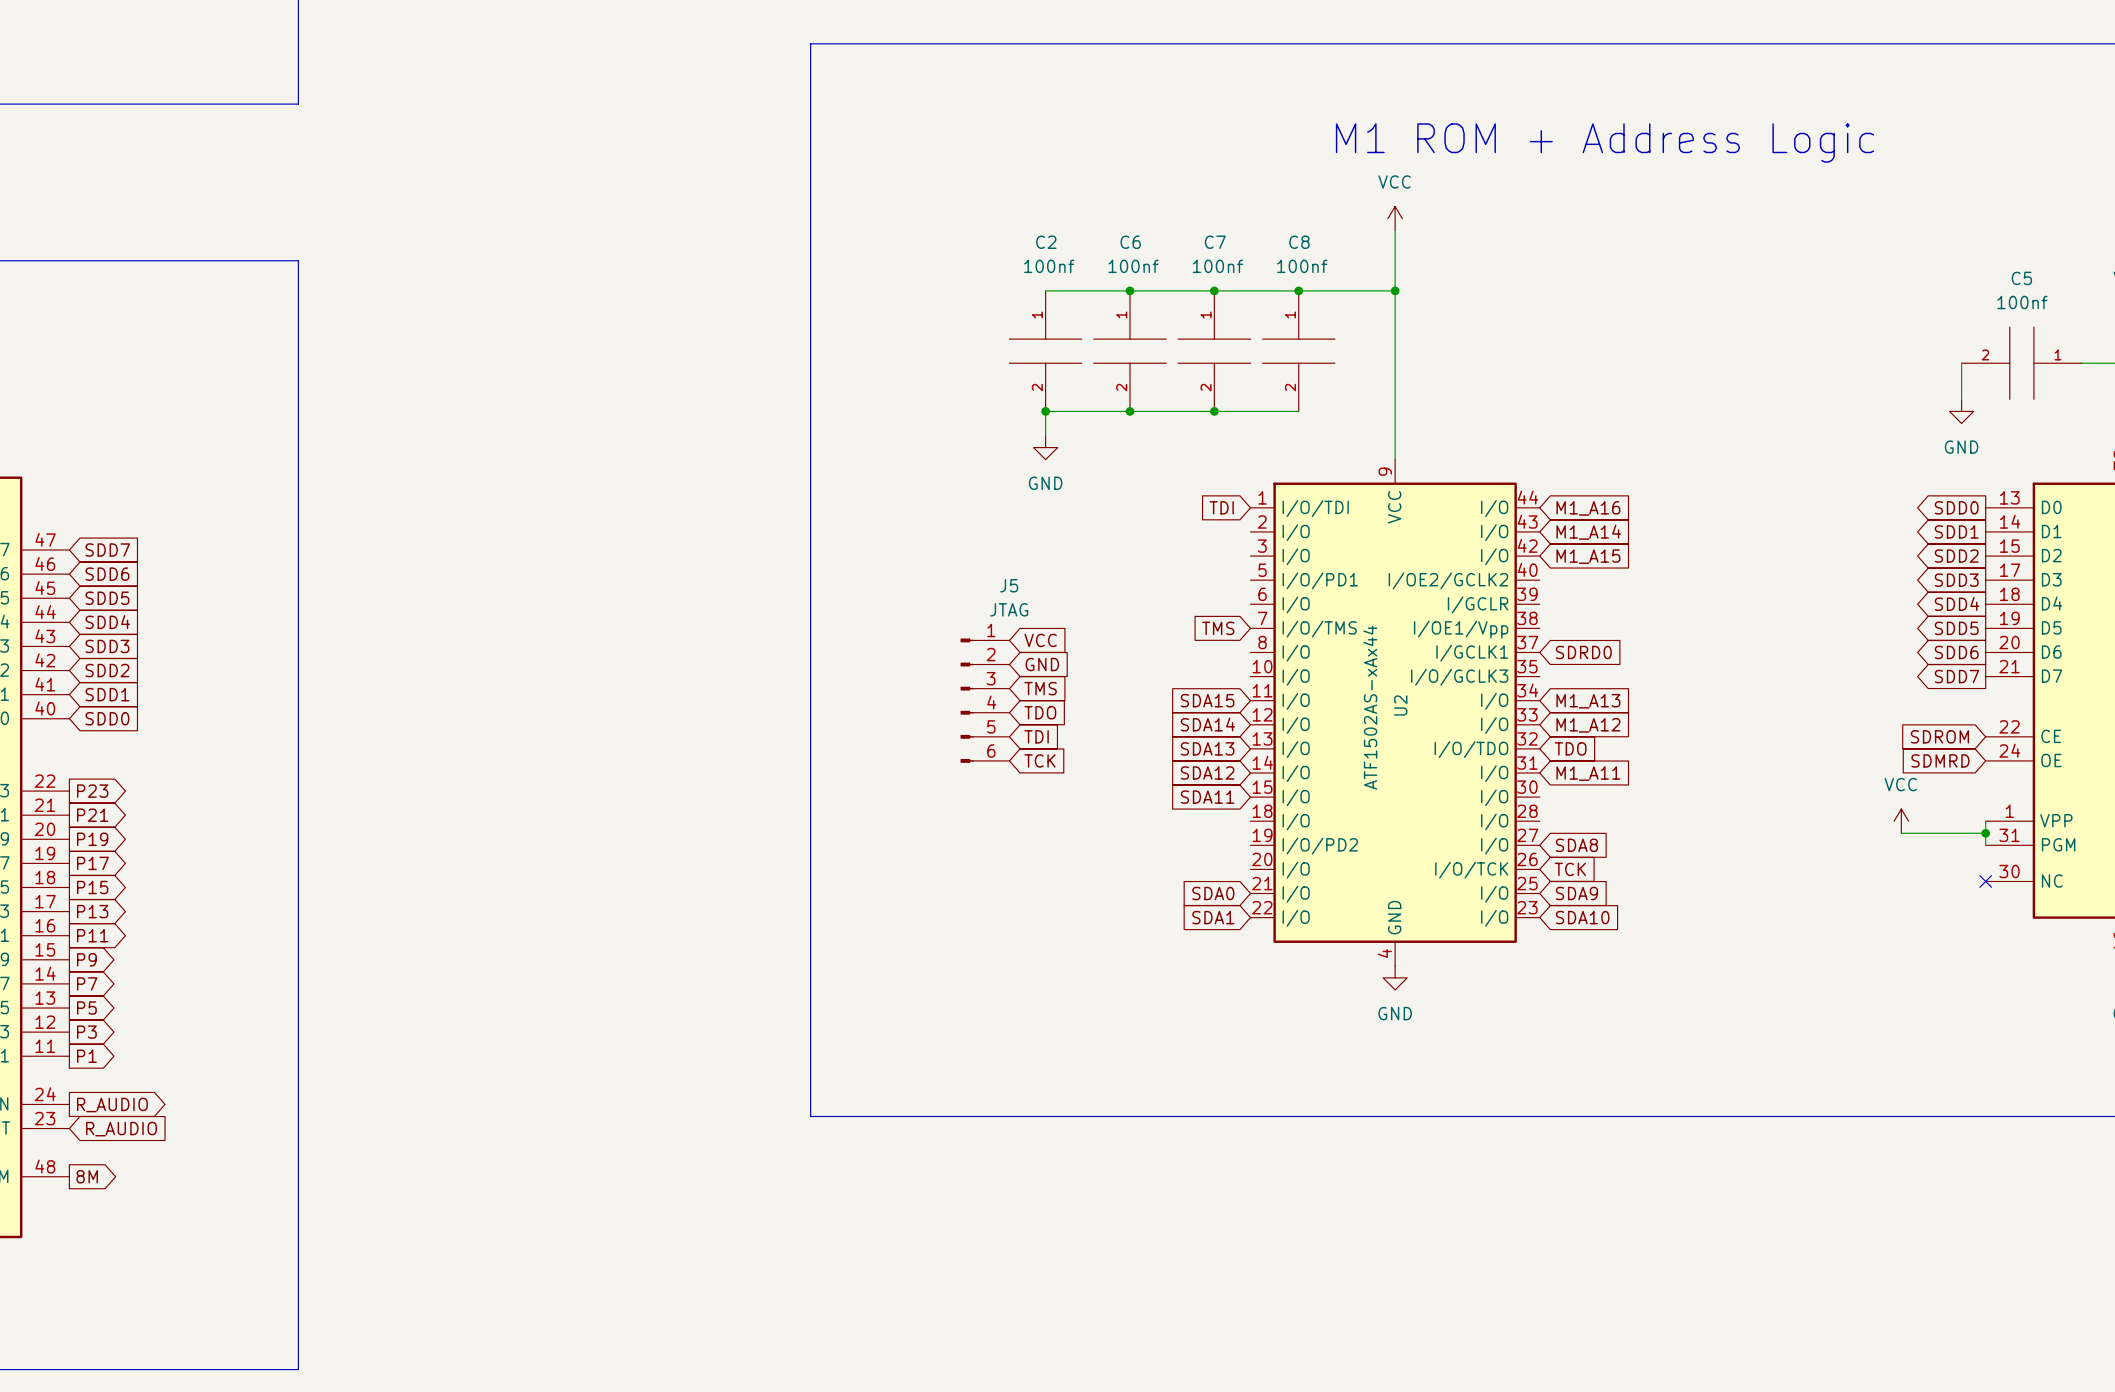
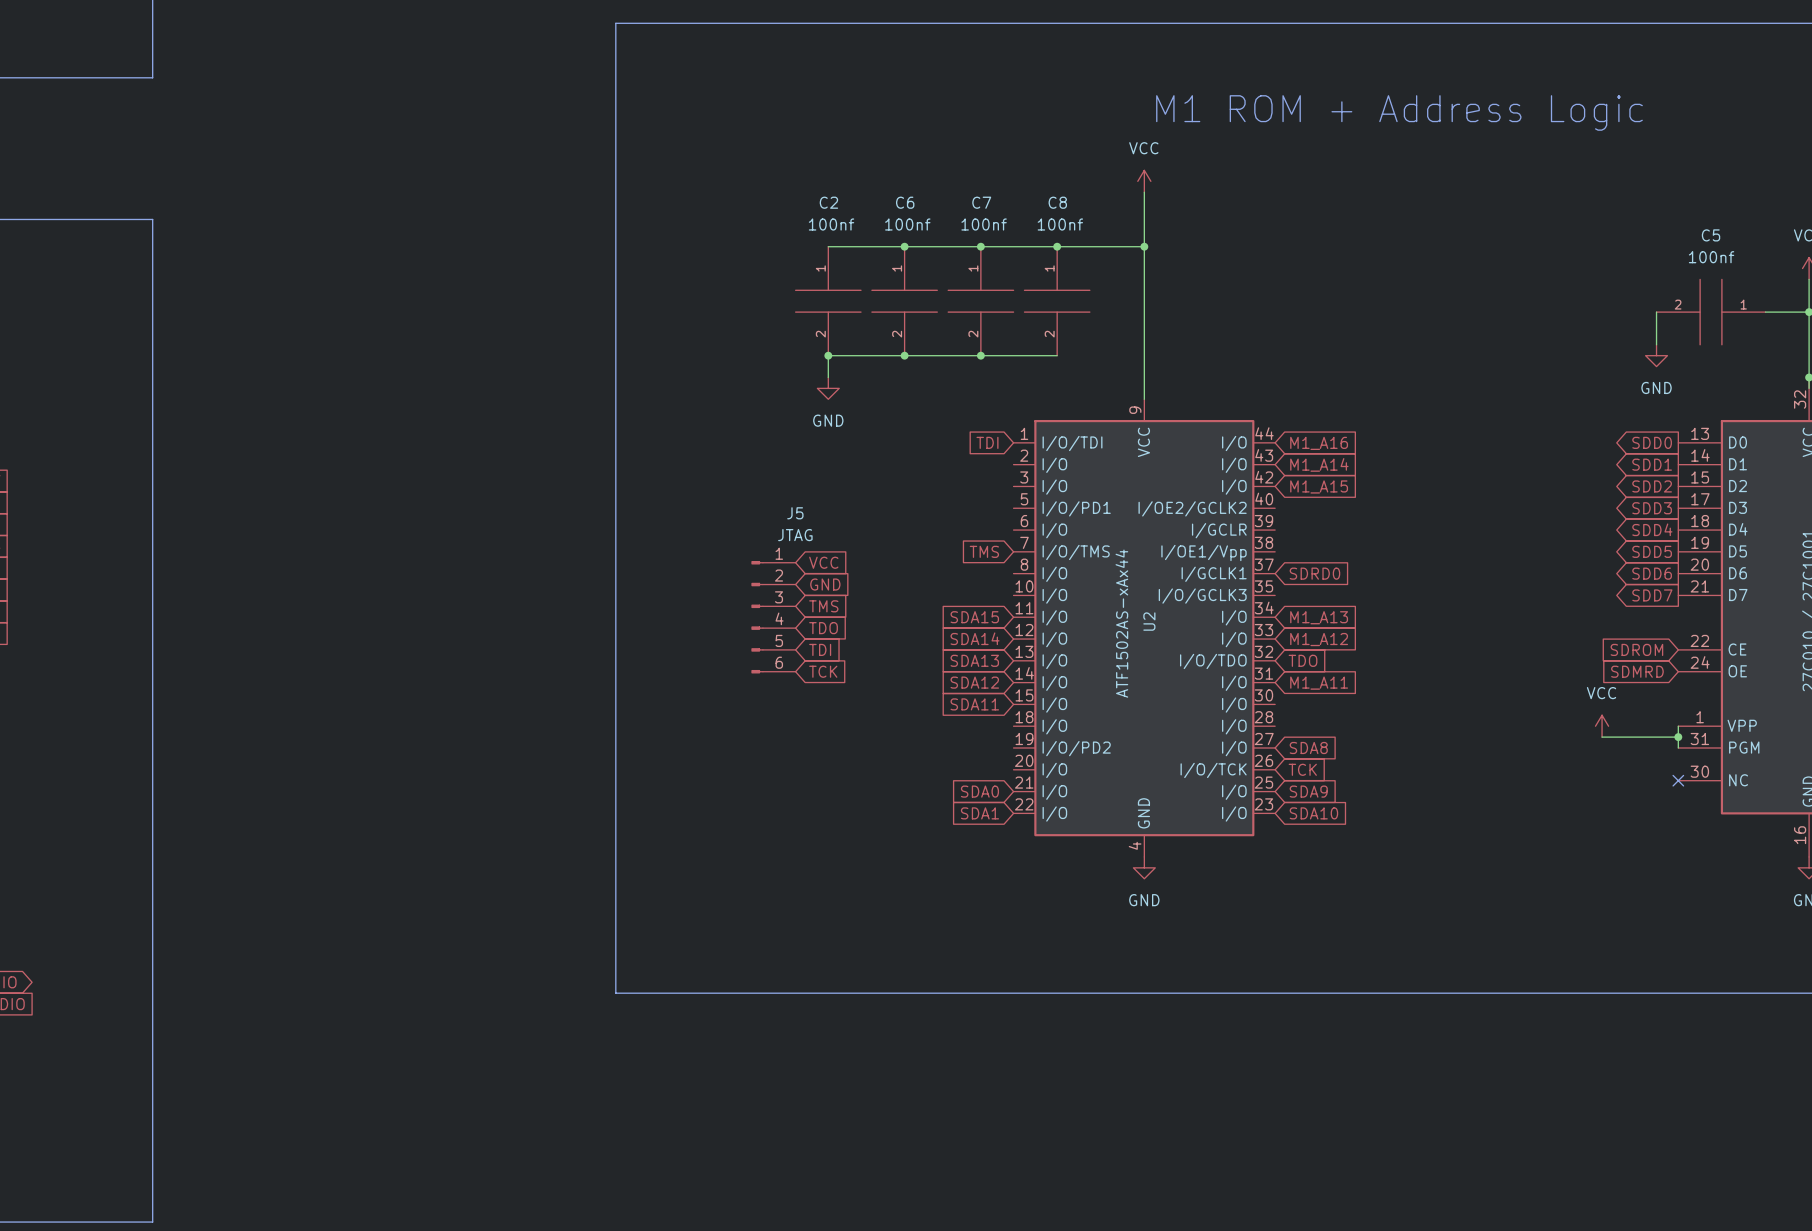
text position: M1 ROM + Address Logic (1605, 142) -> M1 ROM + Address Logic (1399, 112)

